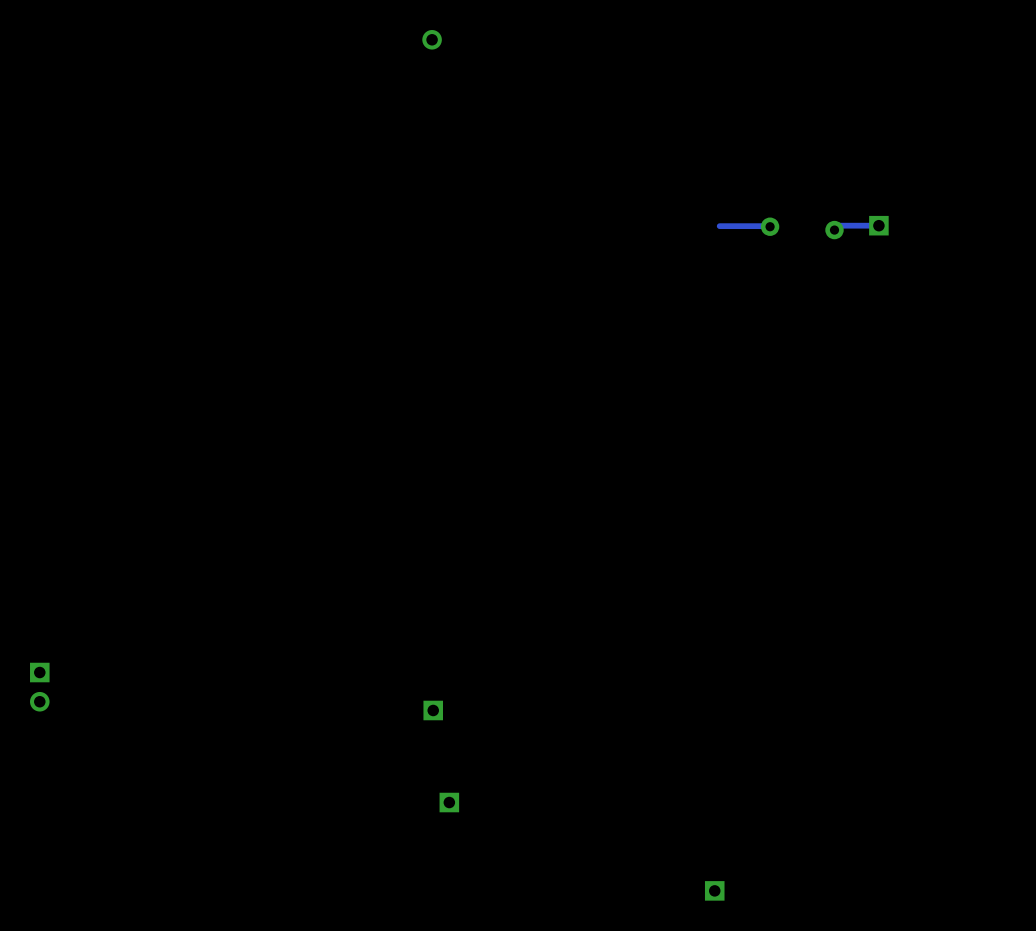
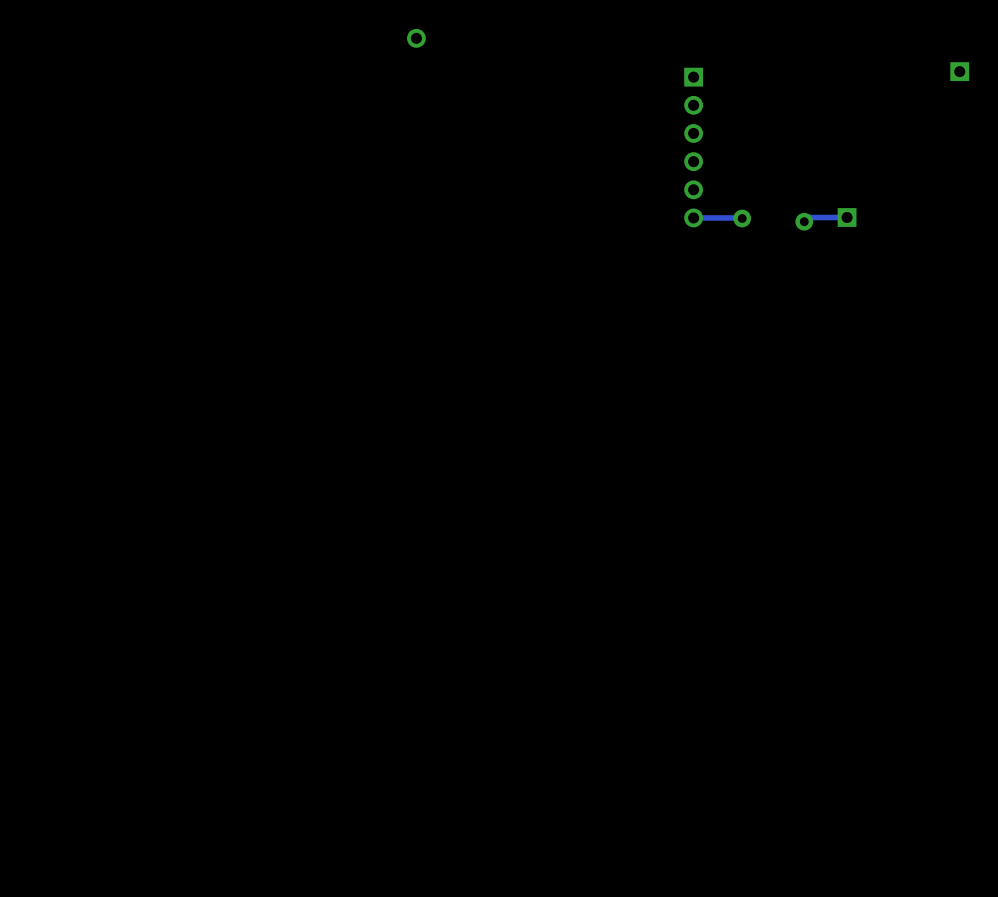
part: none -> (959, 71)
part: none -> (693, 147)
part: (39, 687) -> none
part: (433, 710) -> none
part: (449, 802) -> none
part: (714, 890) -> none

